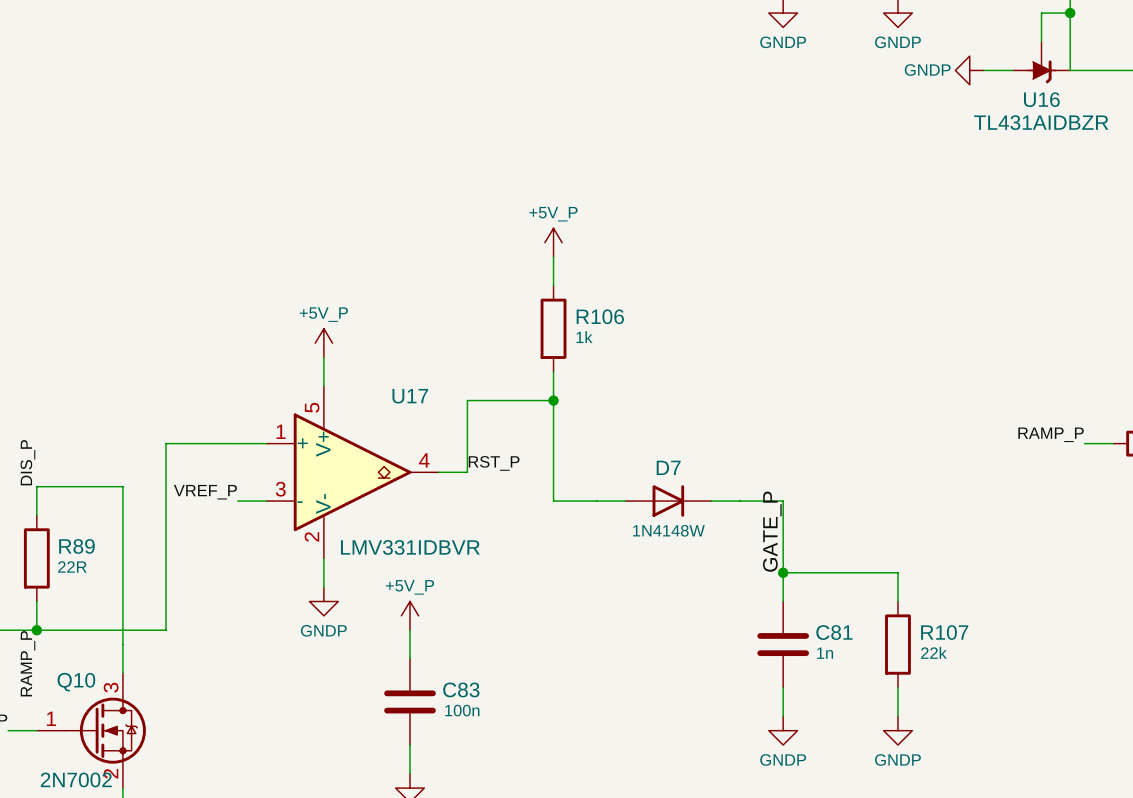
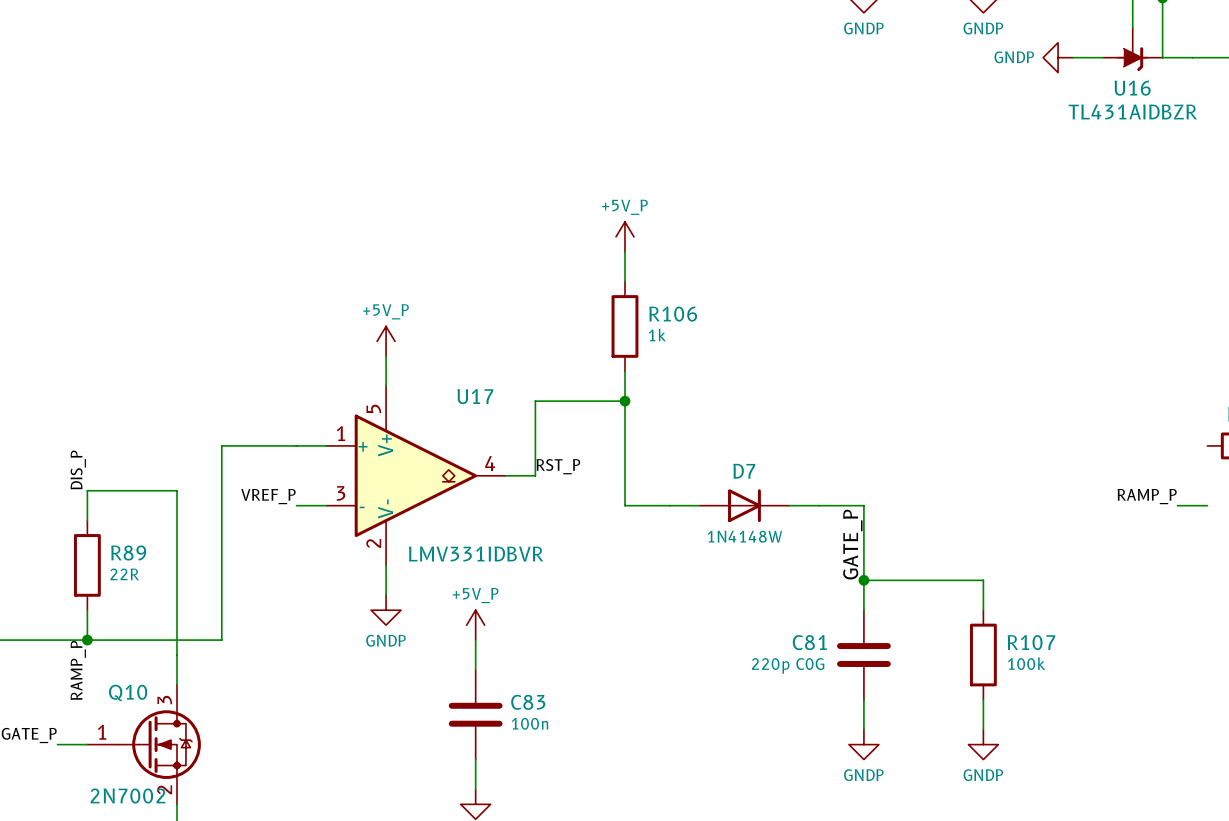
label position: RAMP_P (1051, 434) -> RAMP_P (1147, 496)
wire: (1084, 443) (1113, 443) -> (1177, 505) (1207, 505)
C81 name position: C81 (834, 632) -> C81 (809, 642)
R107 value: 22k (933, 652) -> 100k (1026, 663)
C81 value: 1n (825, 653) -> 220p C0G (788, 665)

